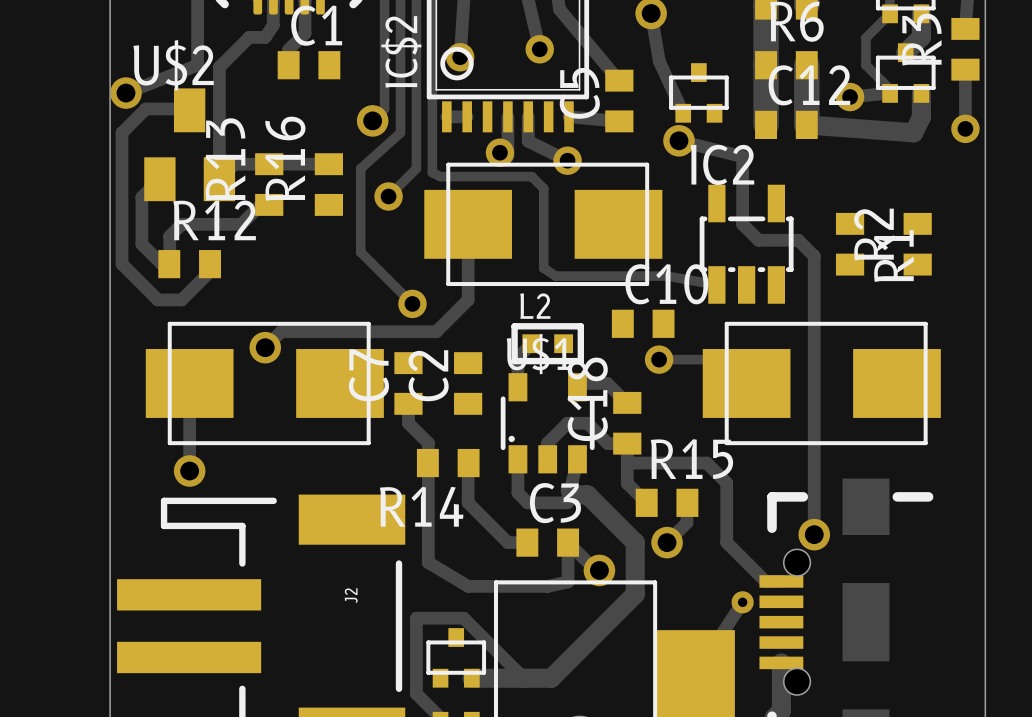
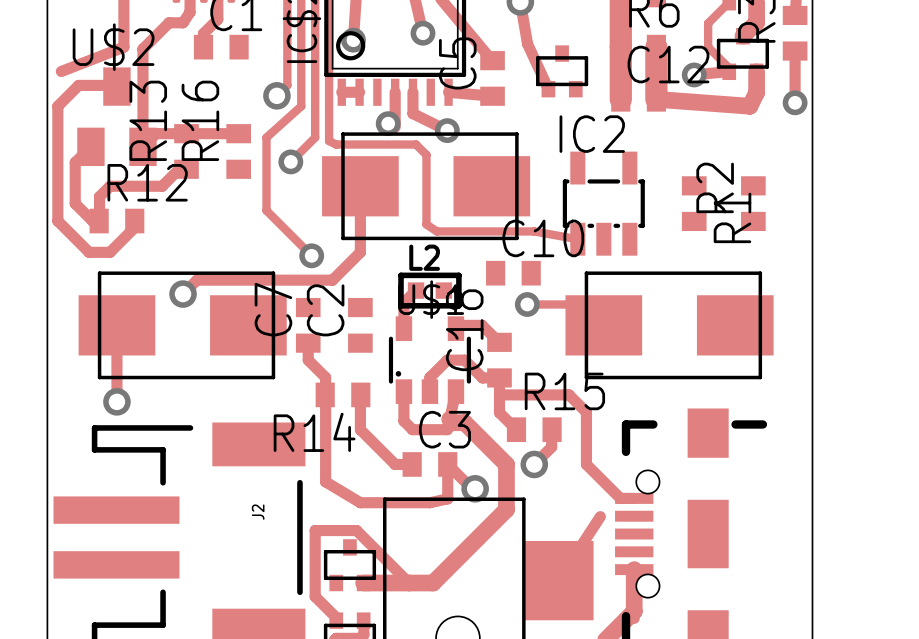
via: (126, 93) -> none
track: (678, 140) (742, 156) (742, 224) (758, 240) (798, 240) (814, 256) (814, 534) -> none
via: (678, 140) -> none
via: (814, 534) -> none
via: (742, 602) -> none

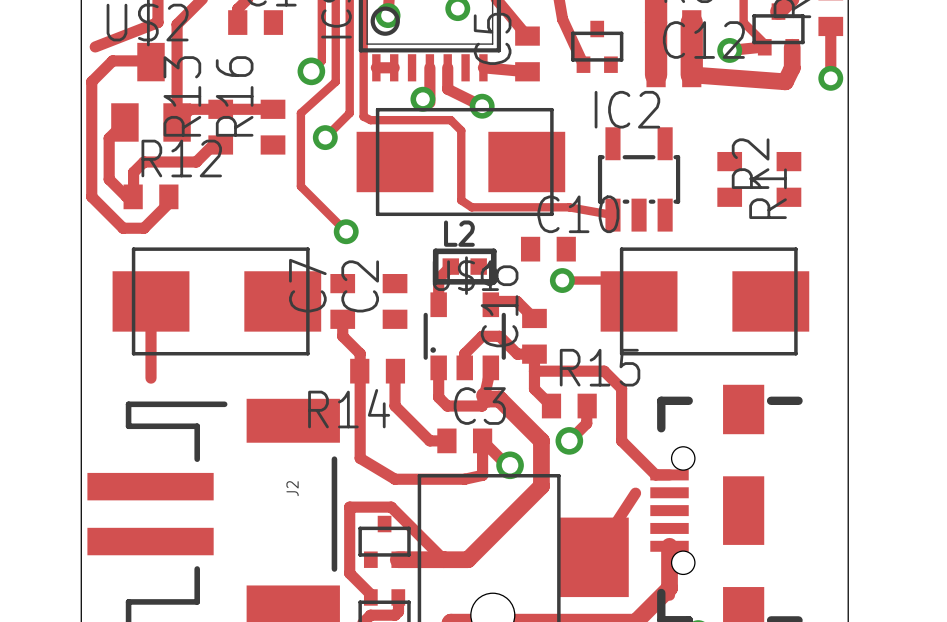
track: (360, 186) (360, 252) (332, 280) (196, 280) (183, 294) -> none
via: (183, 294) -> none
via: (116, 401) -> none

